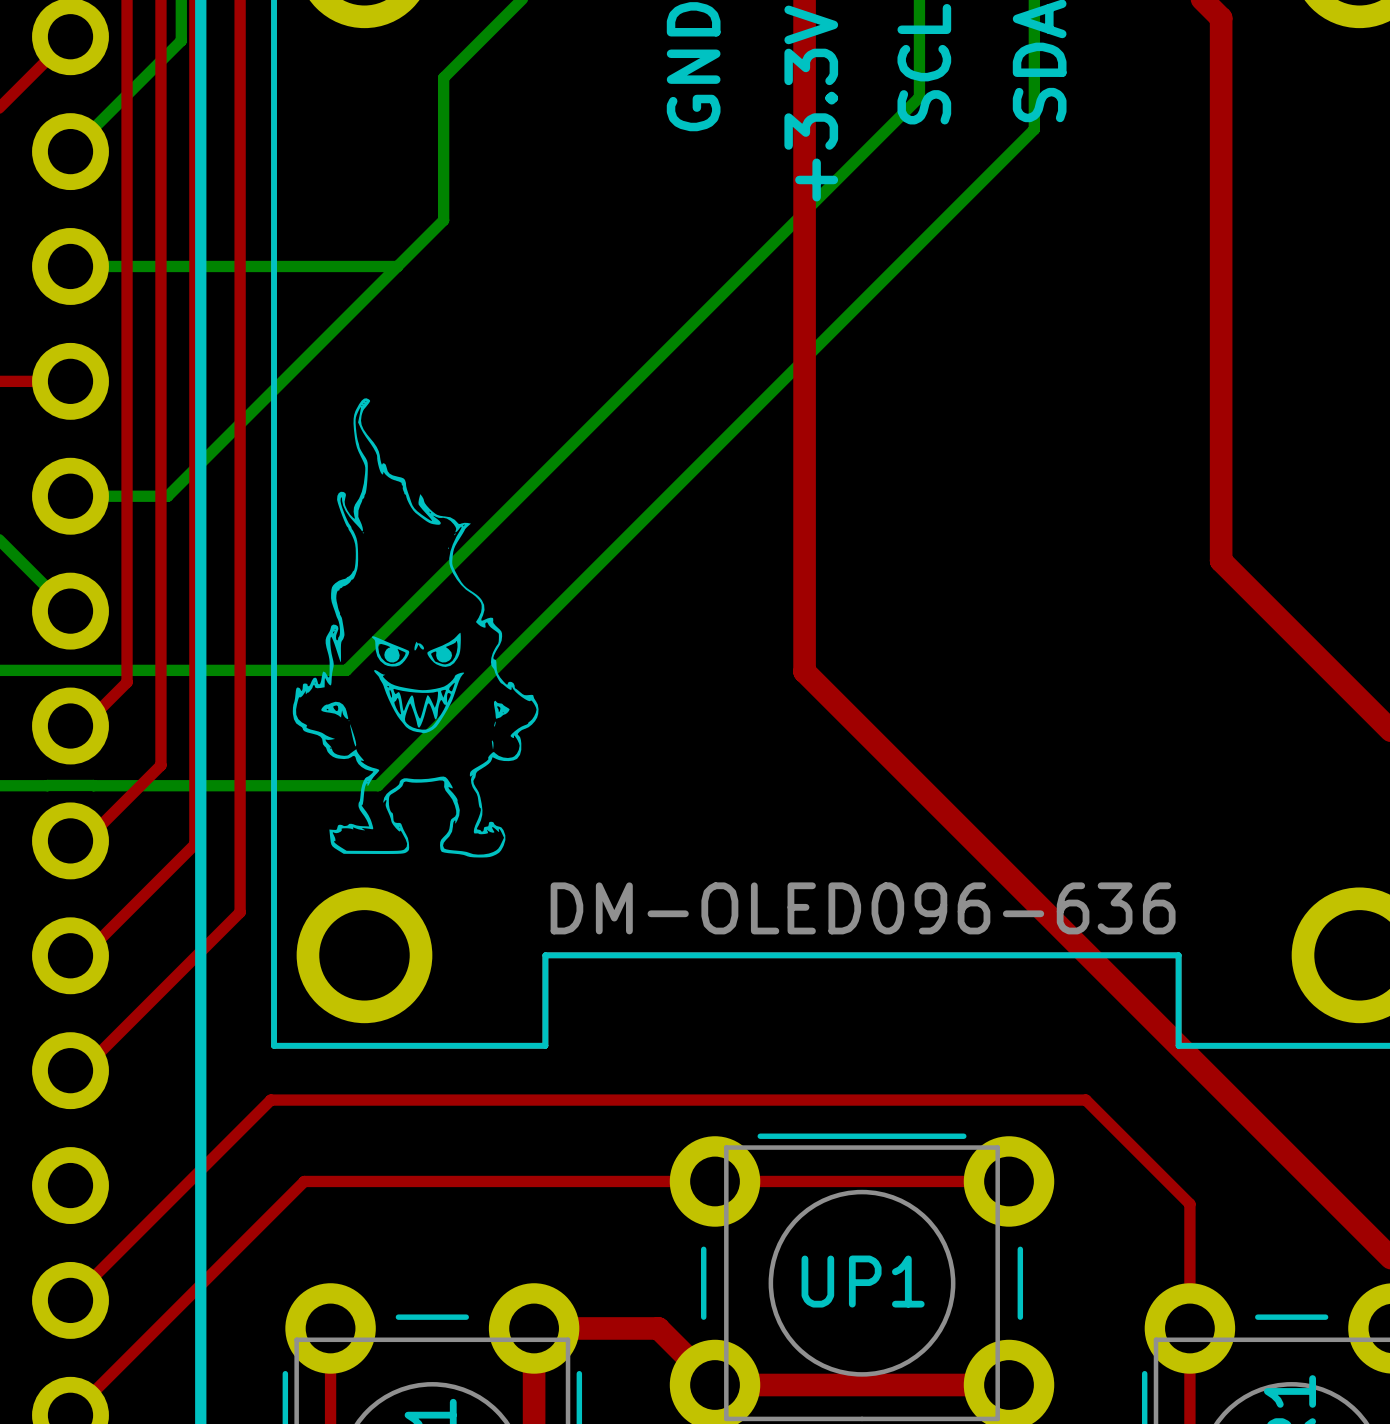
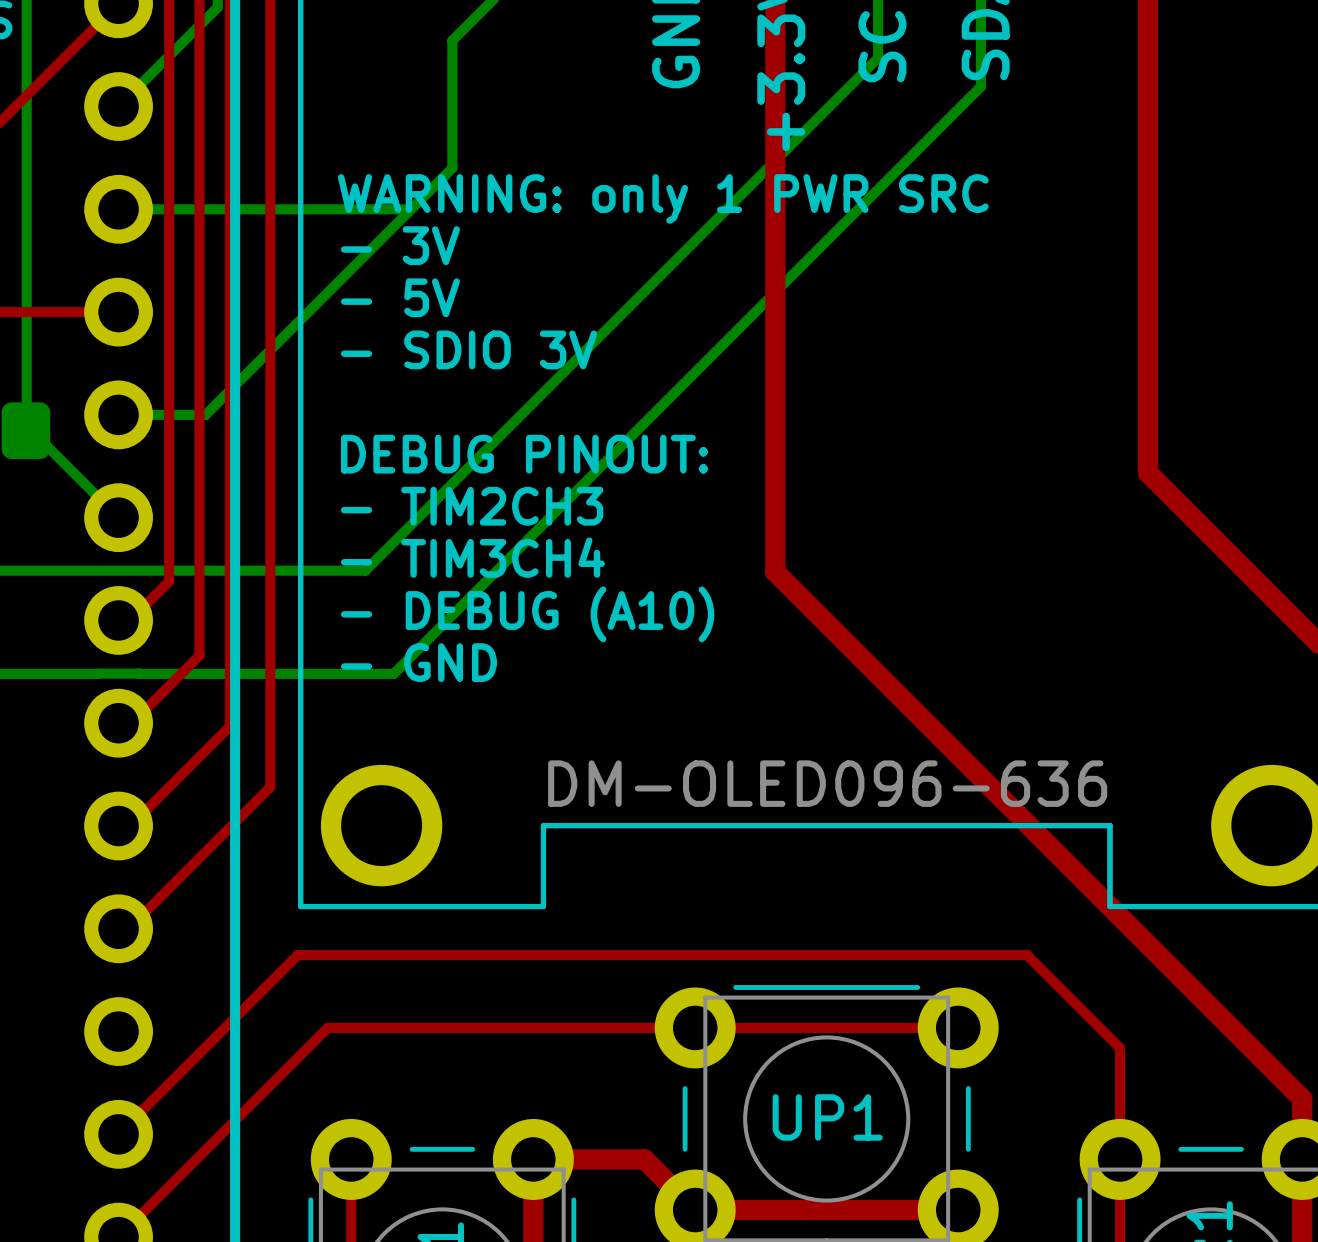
text: none -> WARNING: only 1 PWR SRC (663, 198)
text: none -> - 3V (400, 245)
text: none -> - 5V (400, 297)
drawing: [292, 398, 539, 858] -> none
text: none -> - SDIO 3V (469, 349)
text: none -> DEBUG PINOUT: (524, 454)
text: none -> - TIM2CH3 (472, 506)
text: none -> - TIM3CH4 (472, 557)
text: none -> - DEBUG (A10) (527, 614)
text: none -> - GND (418, 662)

